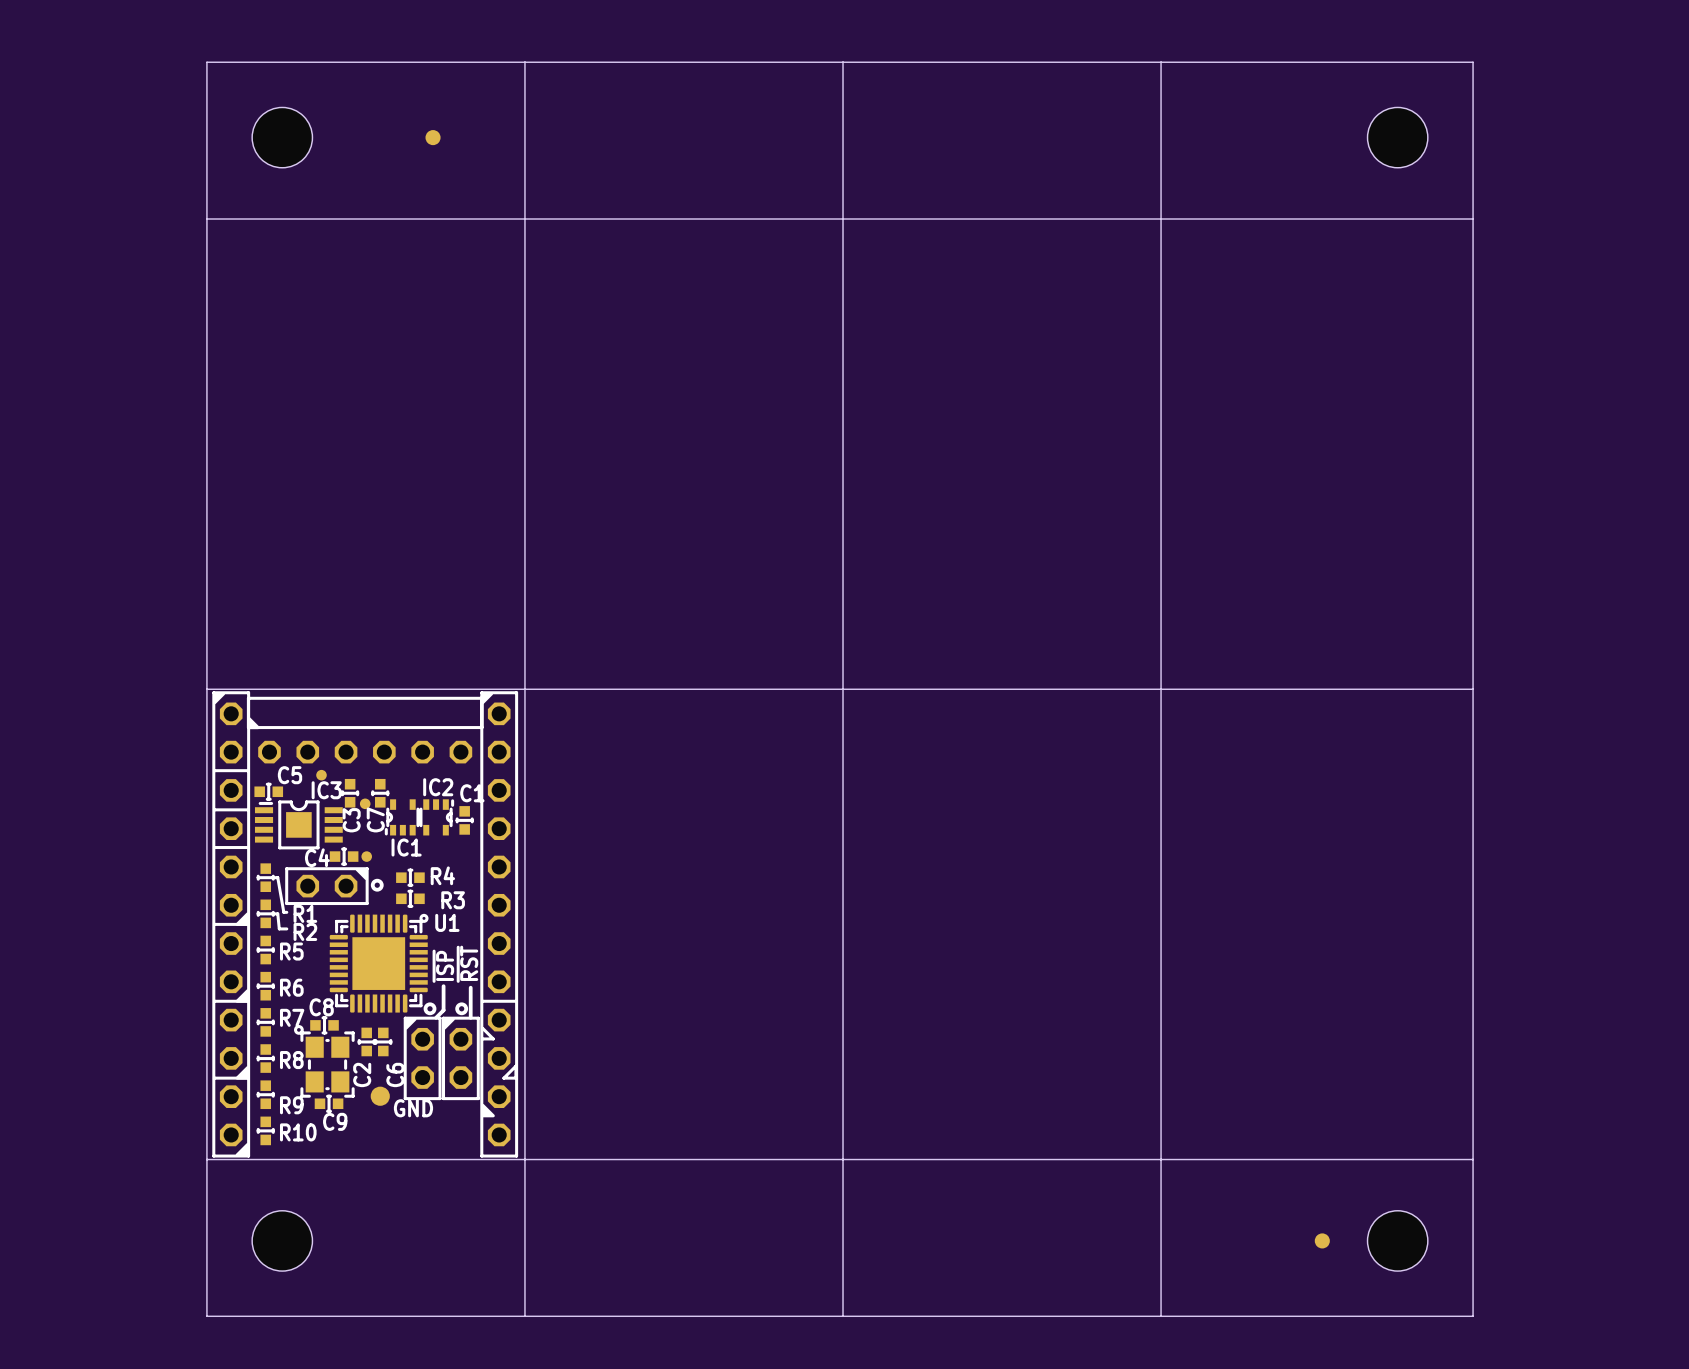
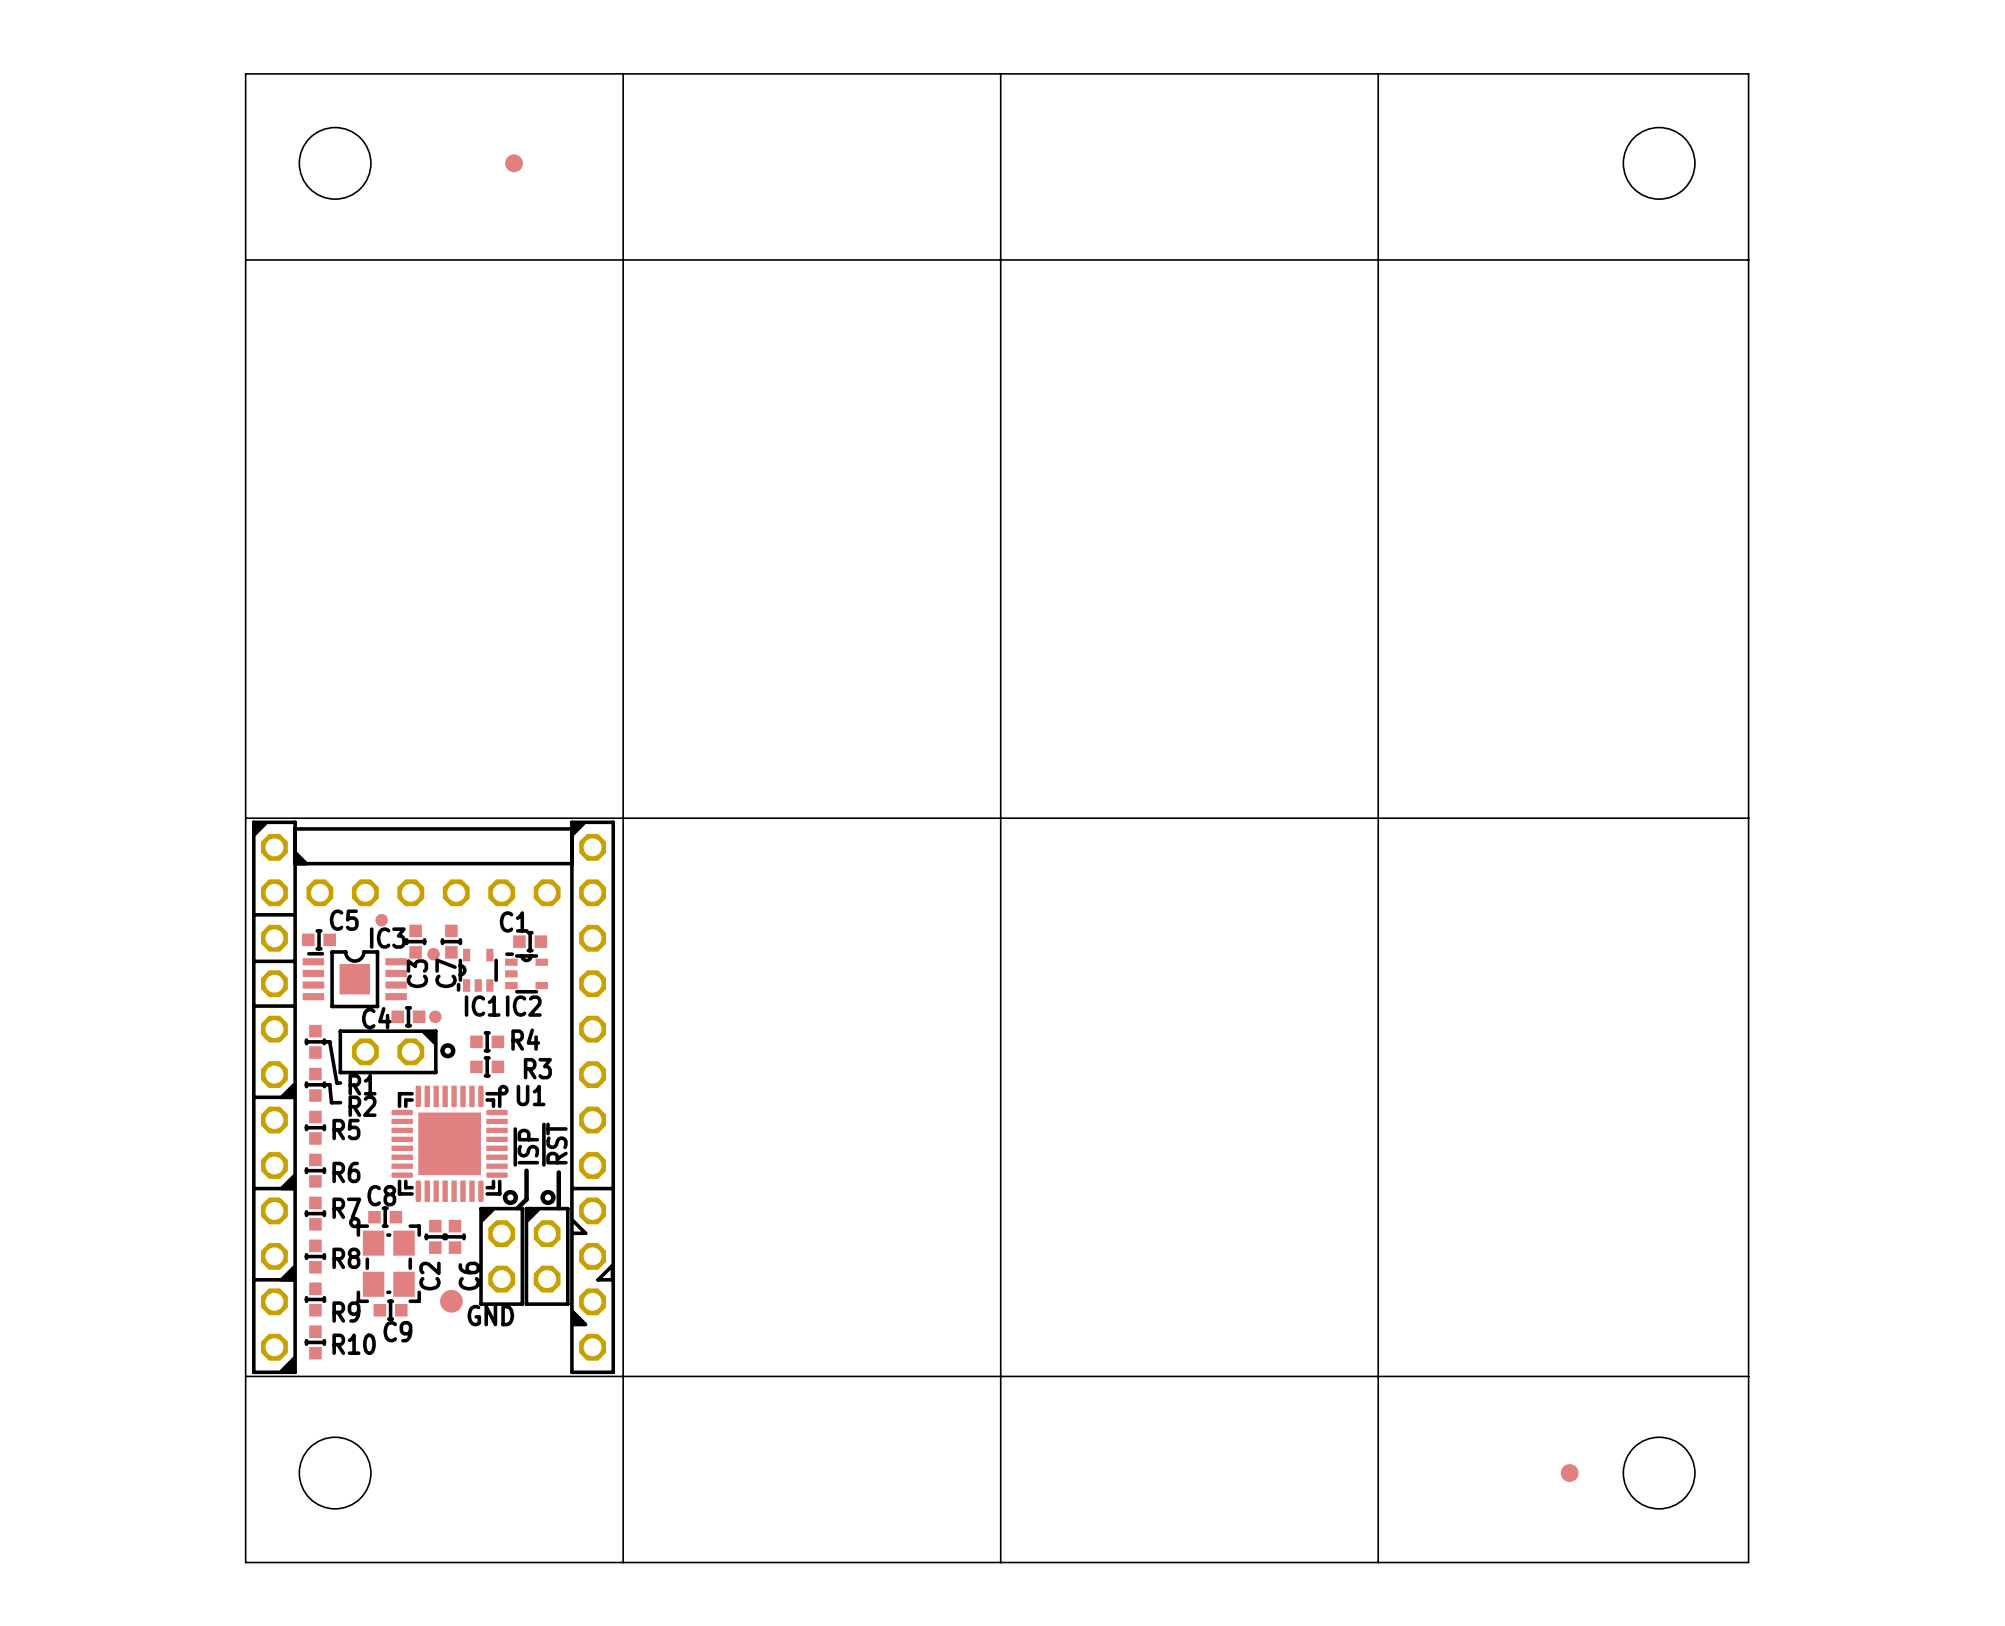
IC2 name position: IC2 (438, 787) -> IC2 (523, 1006)
IC2 rotation: 0° (436, 817) -> 90° counterclockwise (526, 972)
C1 rotation: 0° (464, 820) -> 90° clockwise (530, 941)
C1 position: (464, 820) -> (530, 941)

